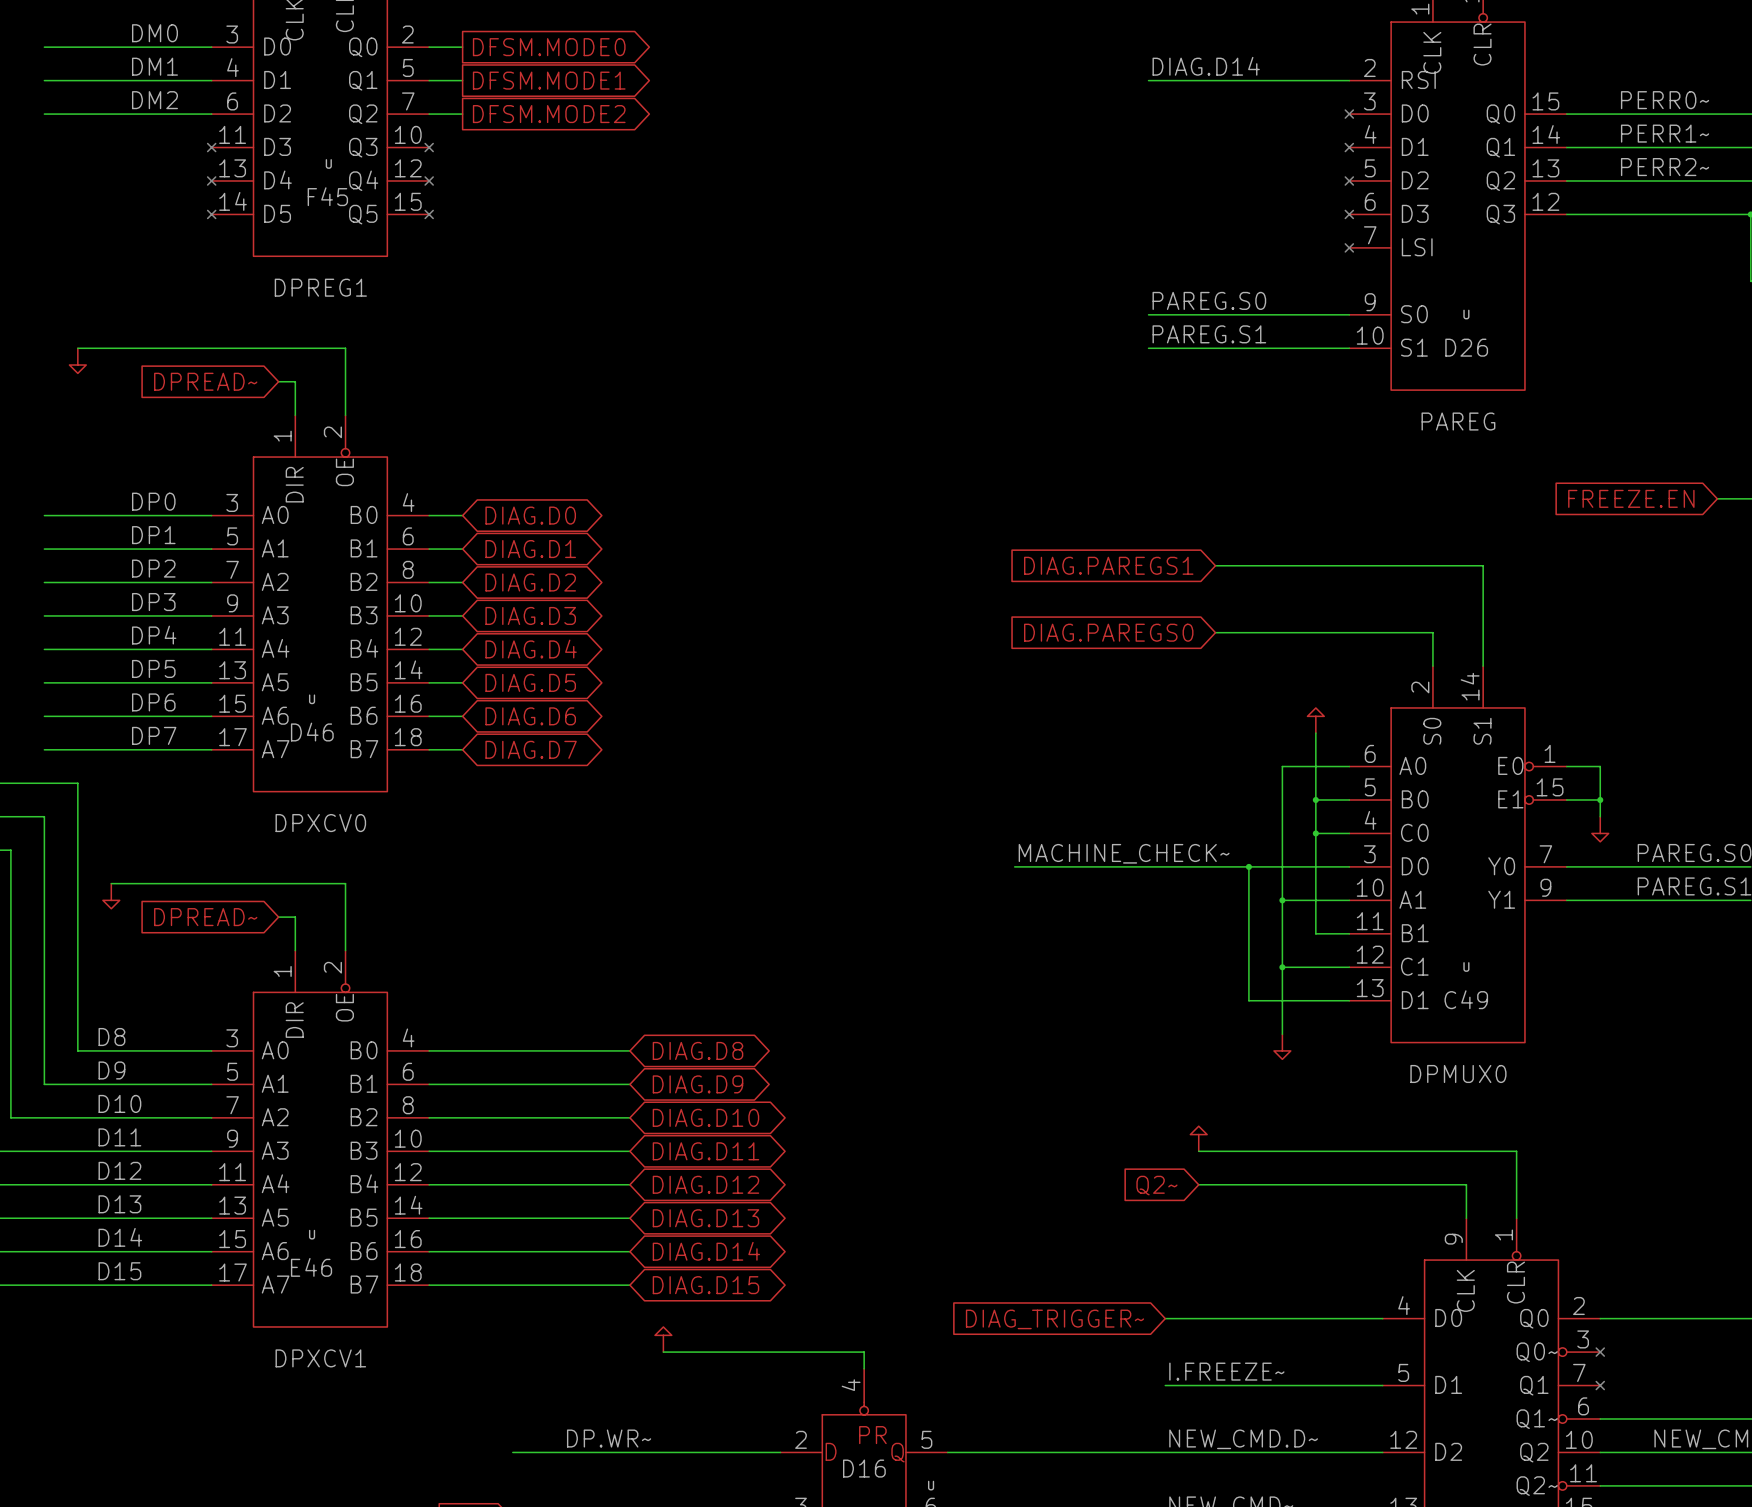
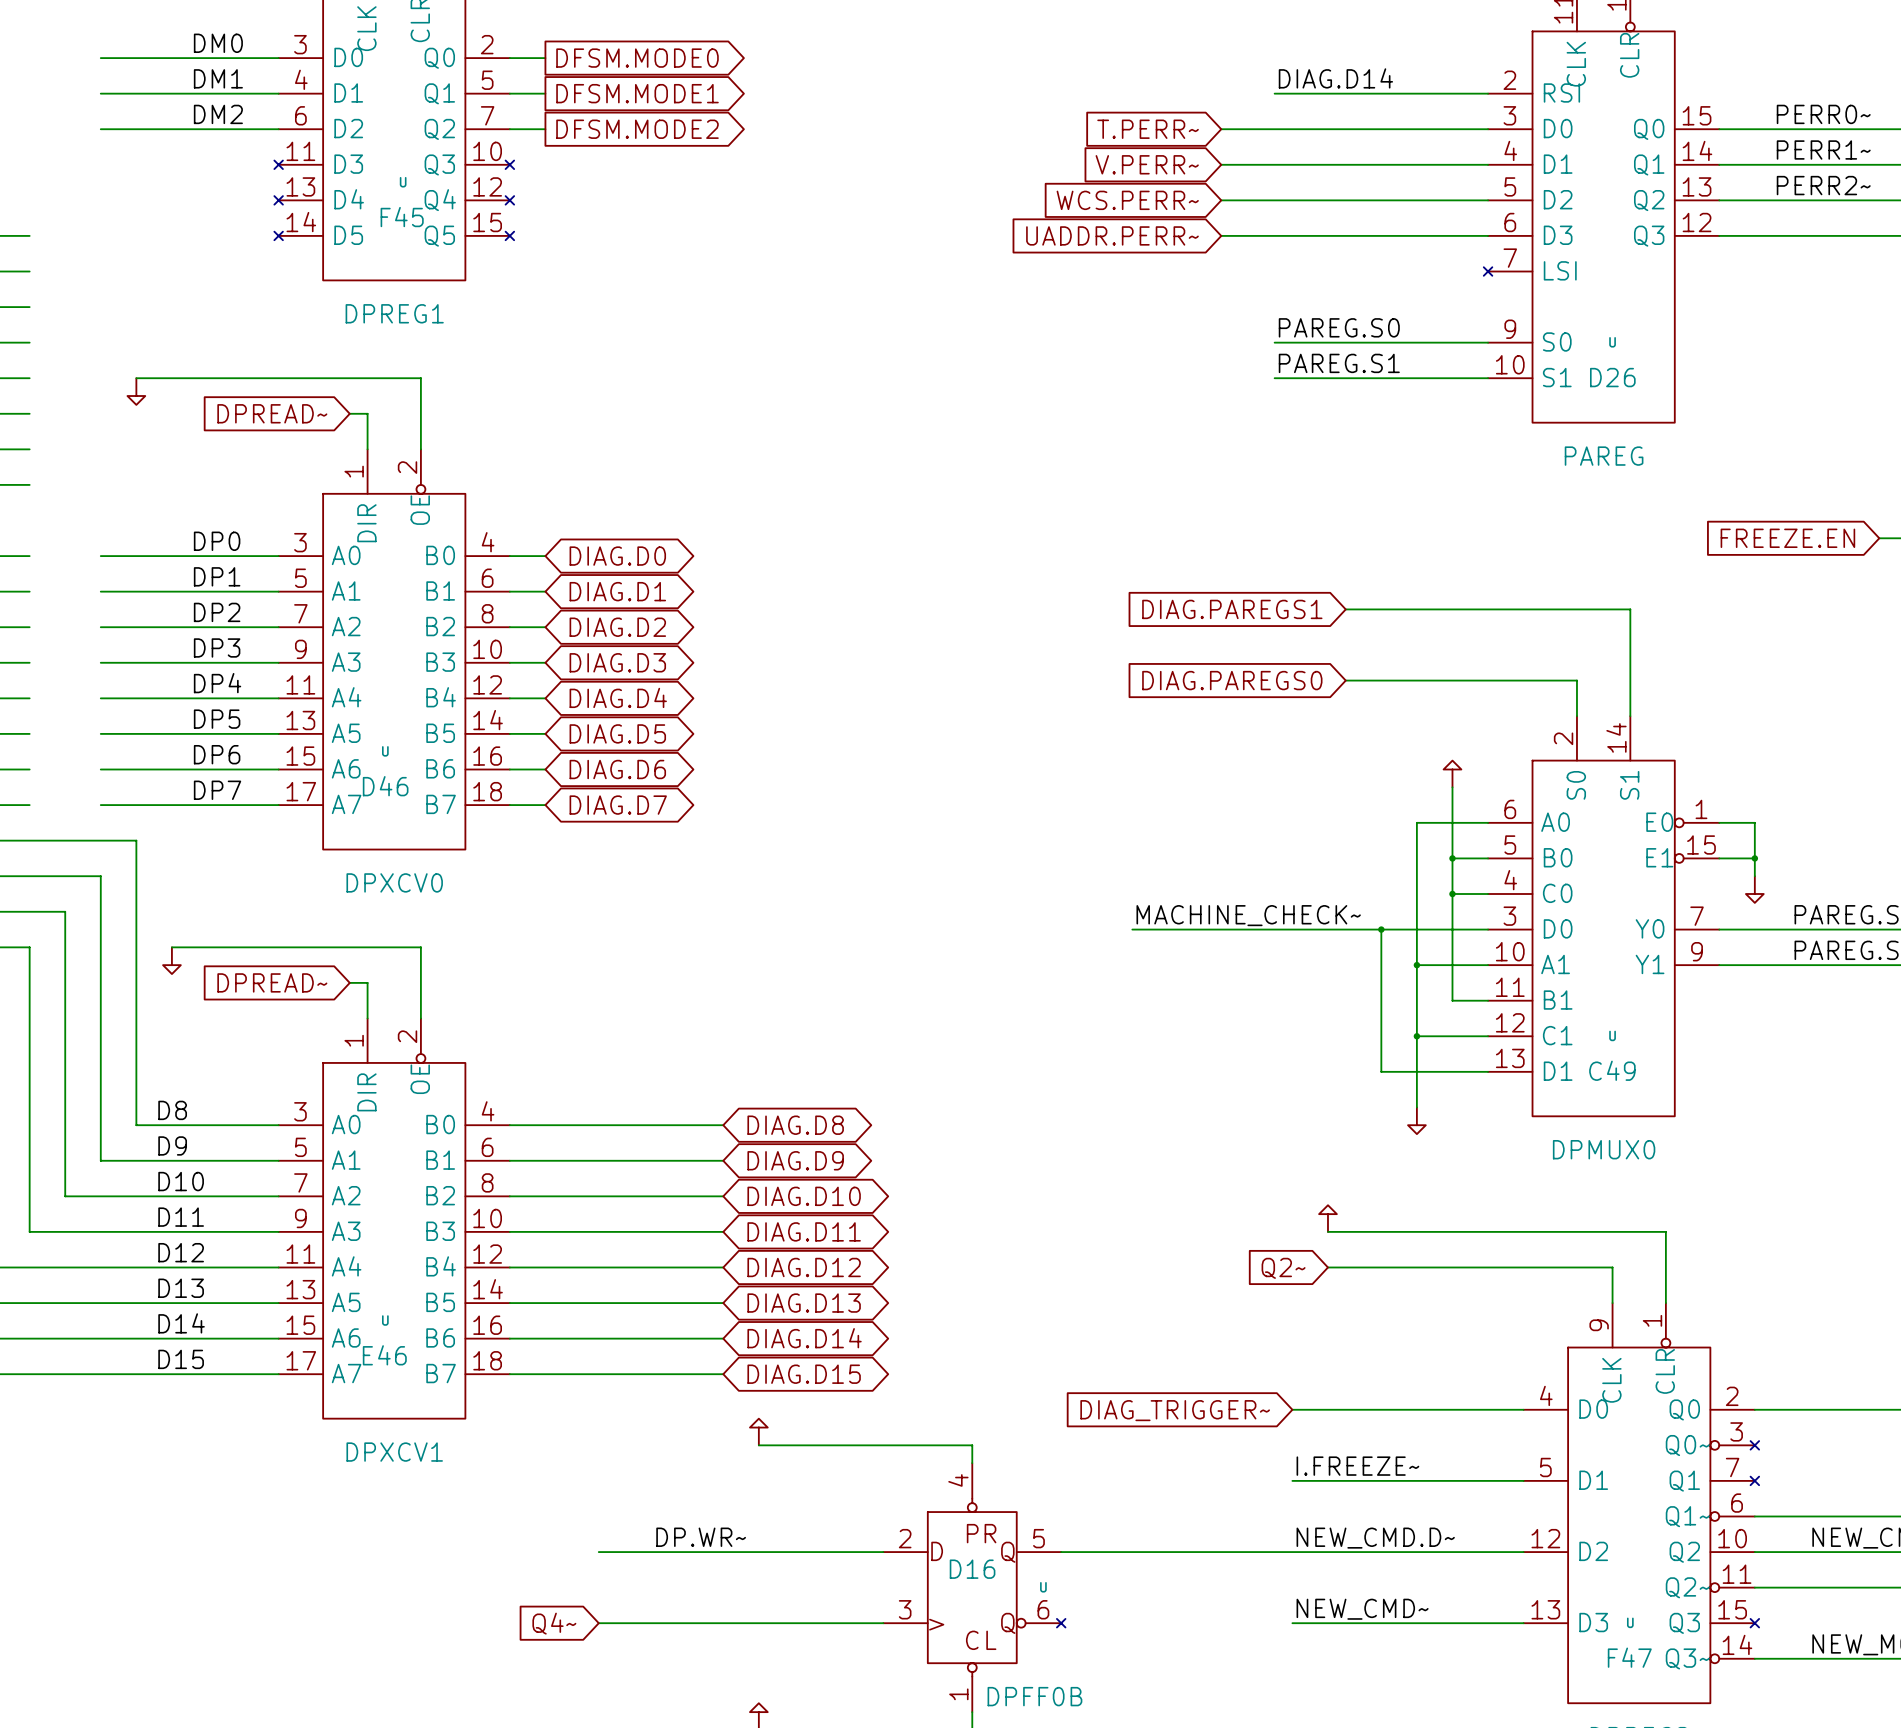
global label: none -> T.PERR~ (1148, 129)
wire: none -> (1221, 129) (1488, 129)
no-connect mark: (1349, 114) -> none
global label: none -> V.PERR~ (1147, 164)
wire: none -> (1221, 164) (1488, 164)
no-connect mark: (1349, 147) -> none
global label: none -> WCS.PERR~ (1127, 200)
wire: none -> (1221, 200) (1488, 200)
no-connect mark: (1349, 180) -> none
global label: none -> UADDR.PERR~ (1112, 235)
wire: none -> (1221, 235) (1488, 235)
no-connect mark: (1349, 214) -> none

